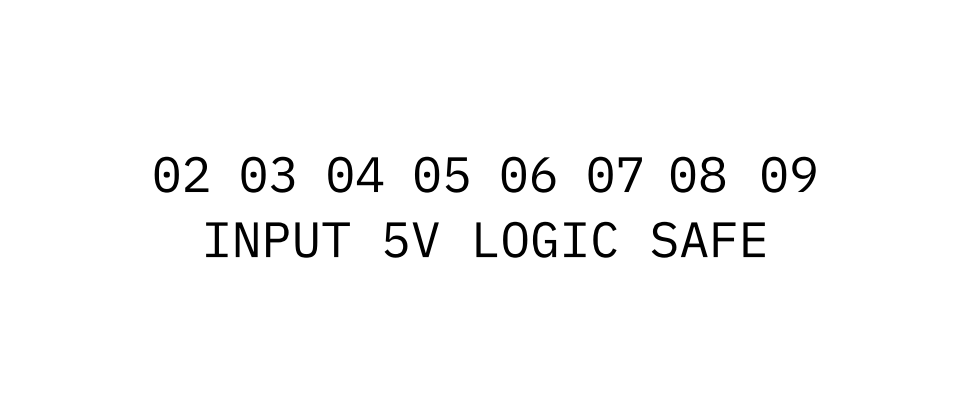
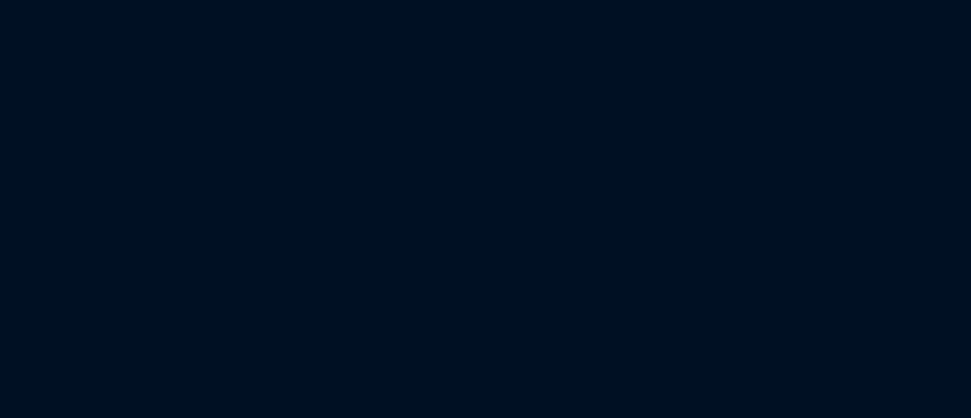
text: 02 (181, 174) -> none
text: 03 (267, 174) -> none
text: 04 (355, 174) -> none
text: 05 (441, 174) -> none
text: 06 (528, 174) -> none
text: 07 (615, 174) -> none
text: 08 (697, 174) -> none
text: 09 (788, 174) -> none
text: INPUT 5V LOGIC SAFE (485, 239) -> none

